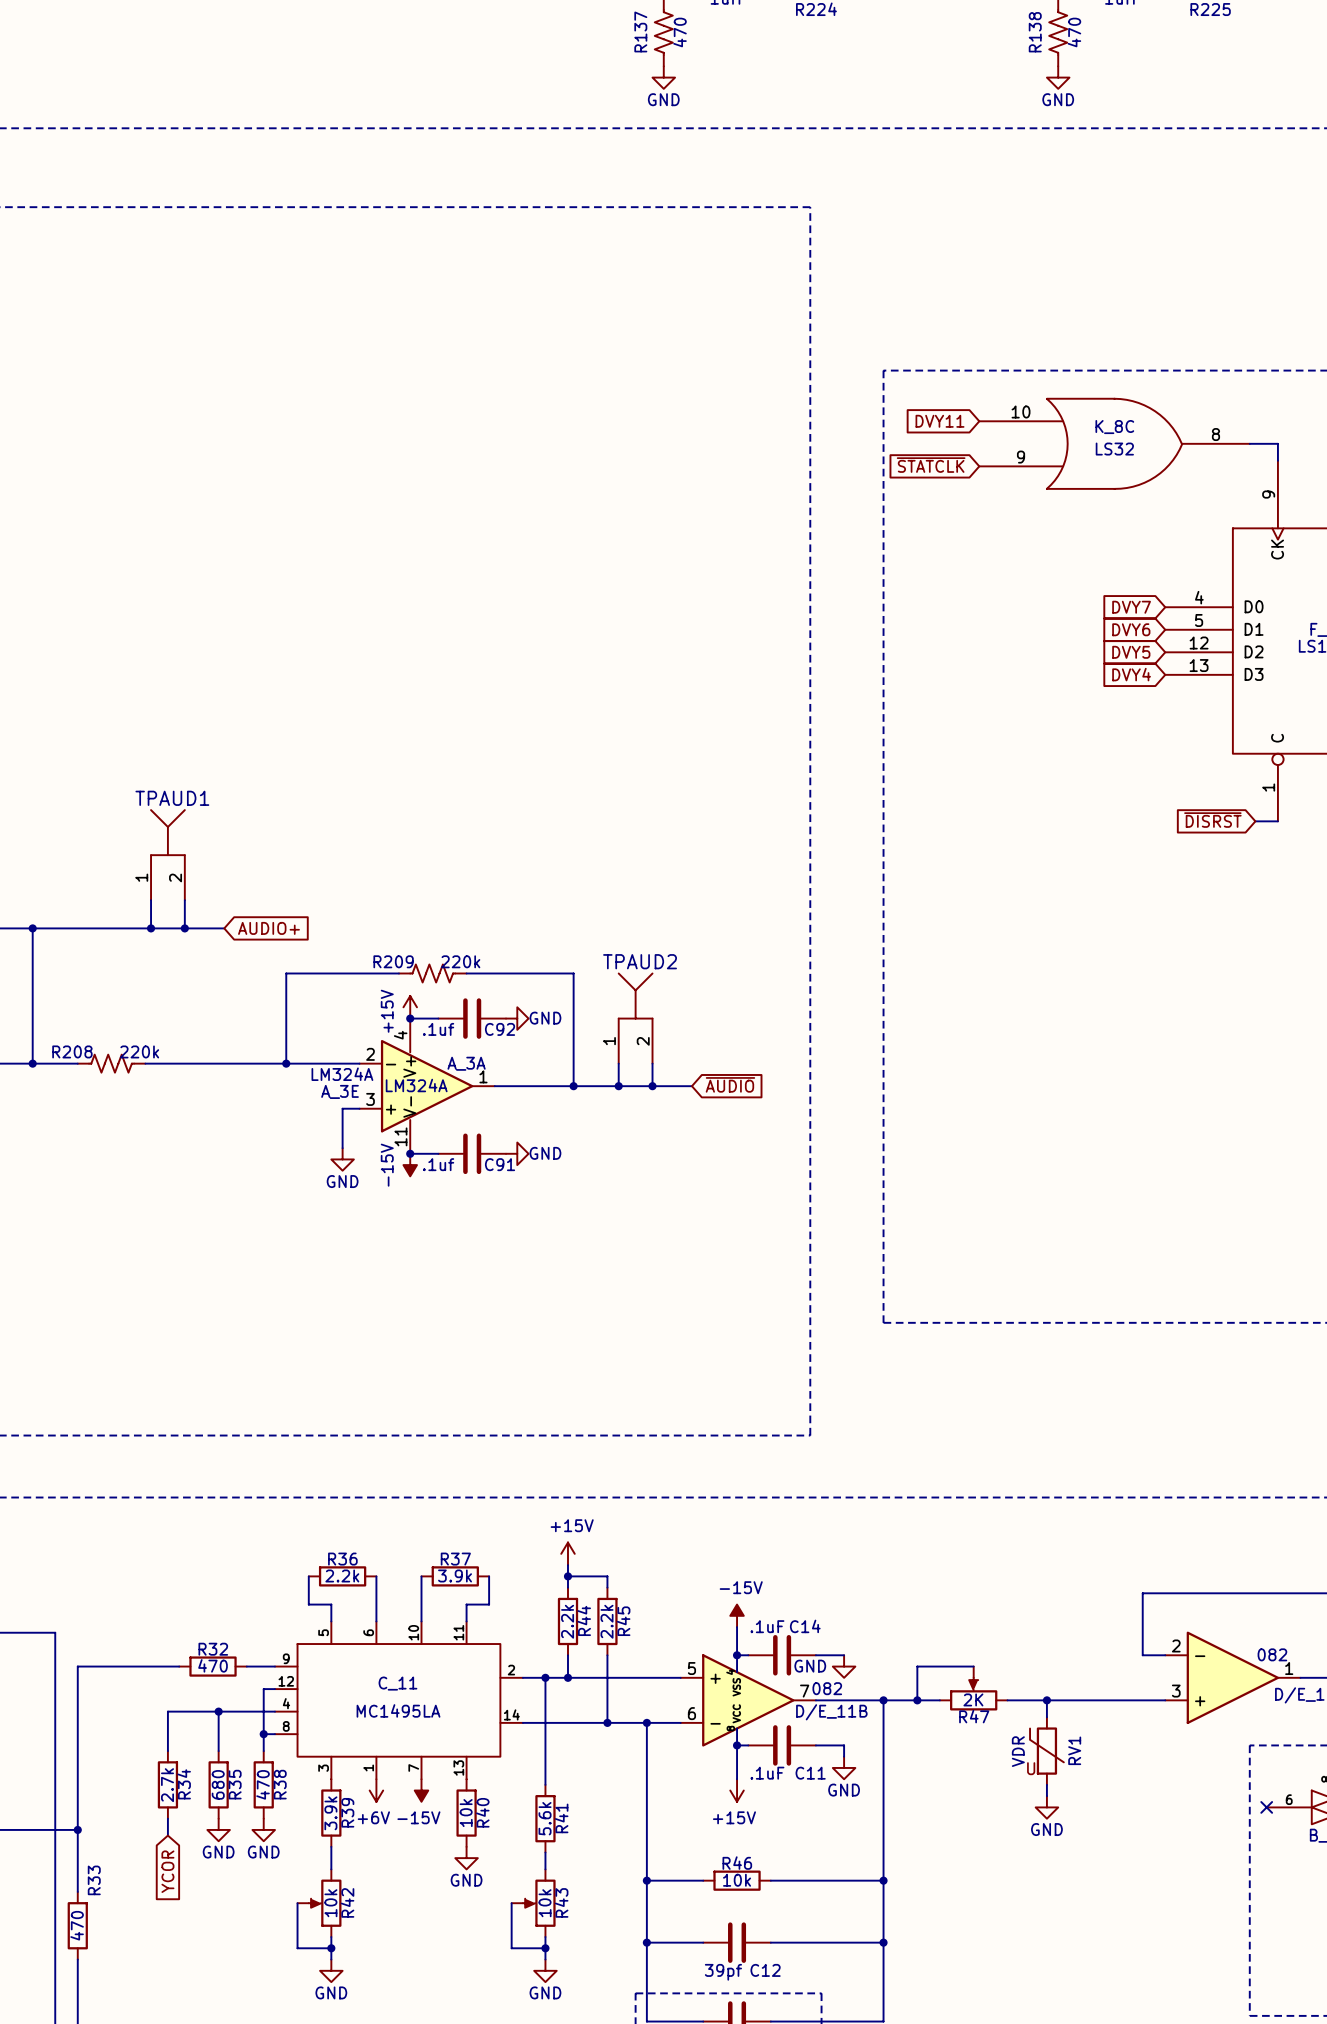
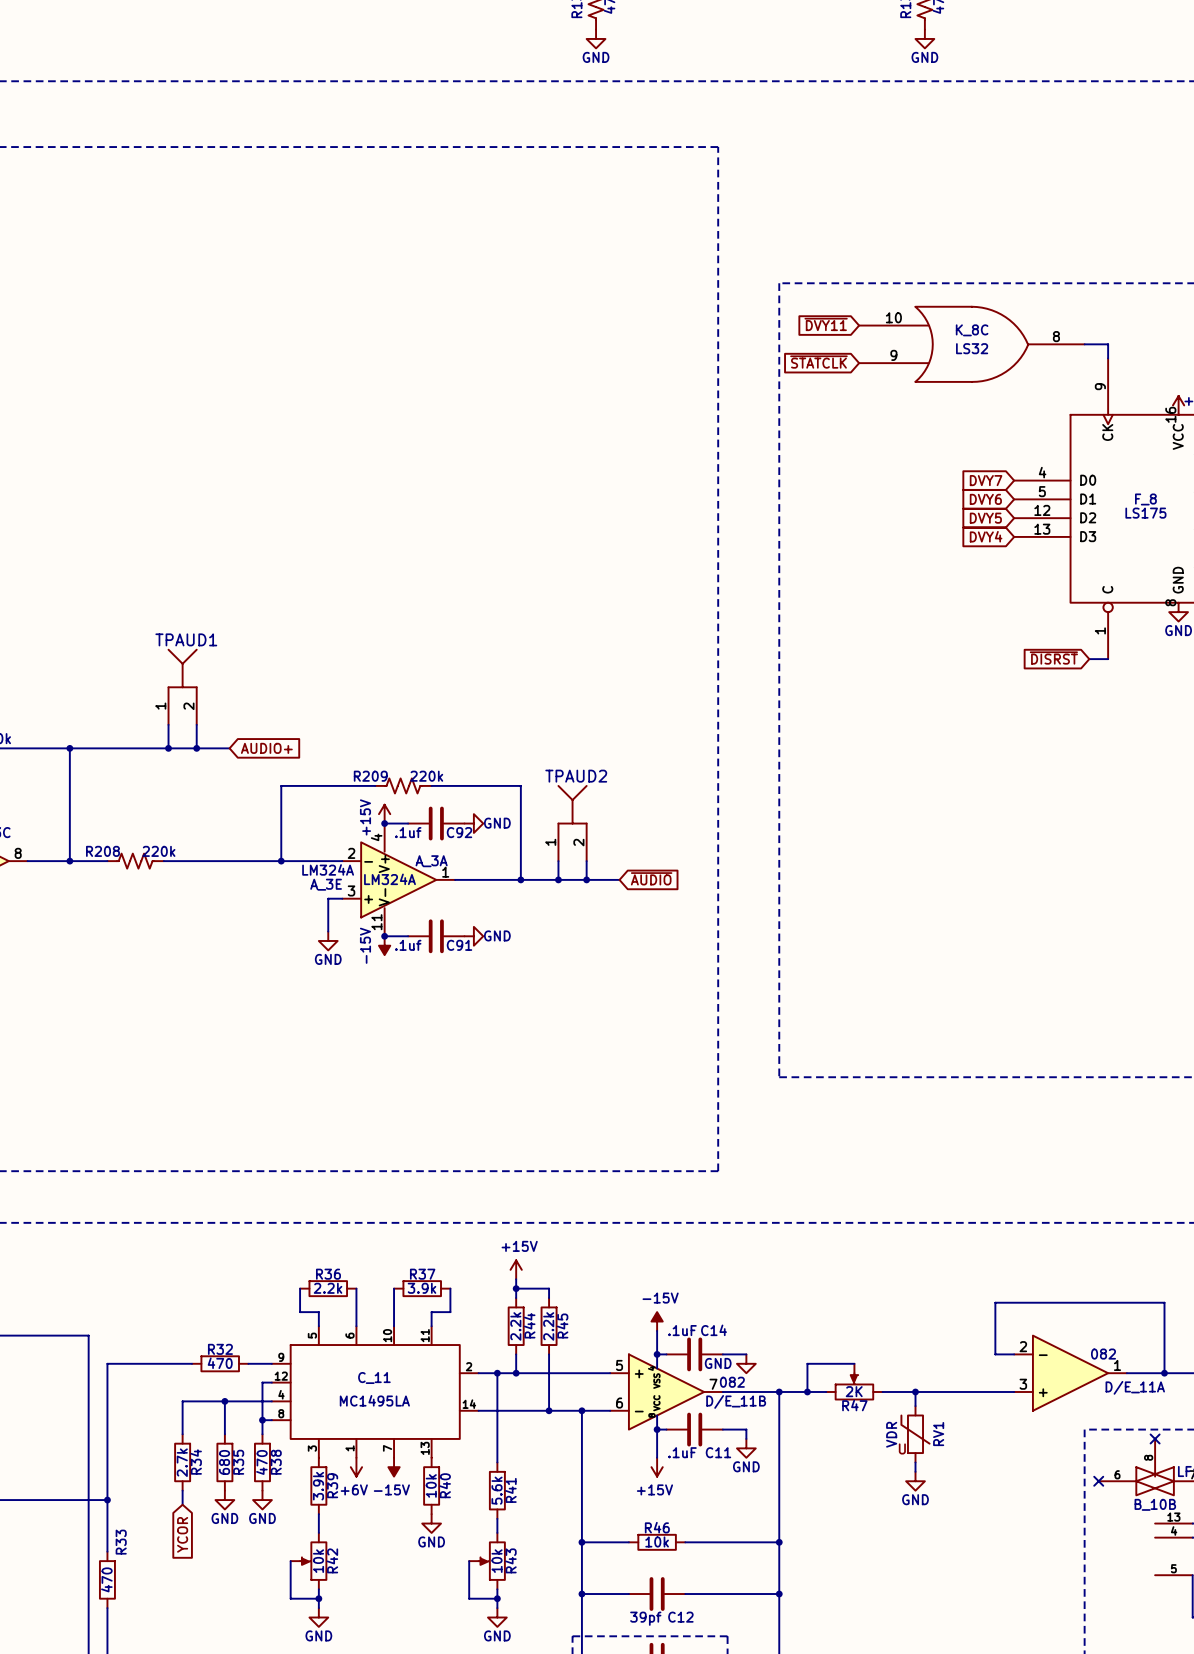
global label: DVY11 (940, 421) -> ~{DVY11} (826, 324)

